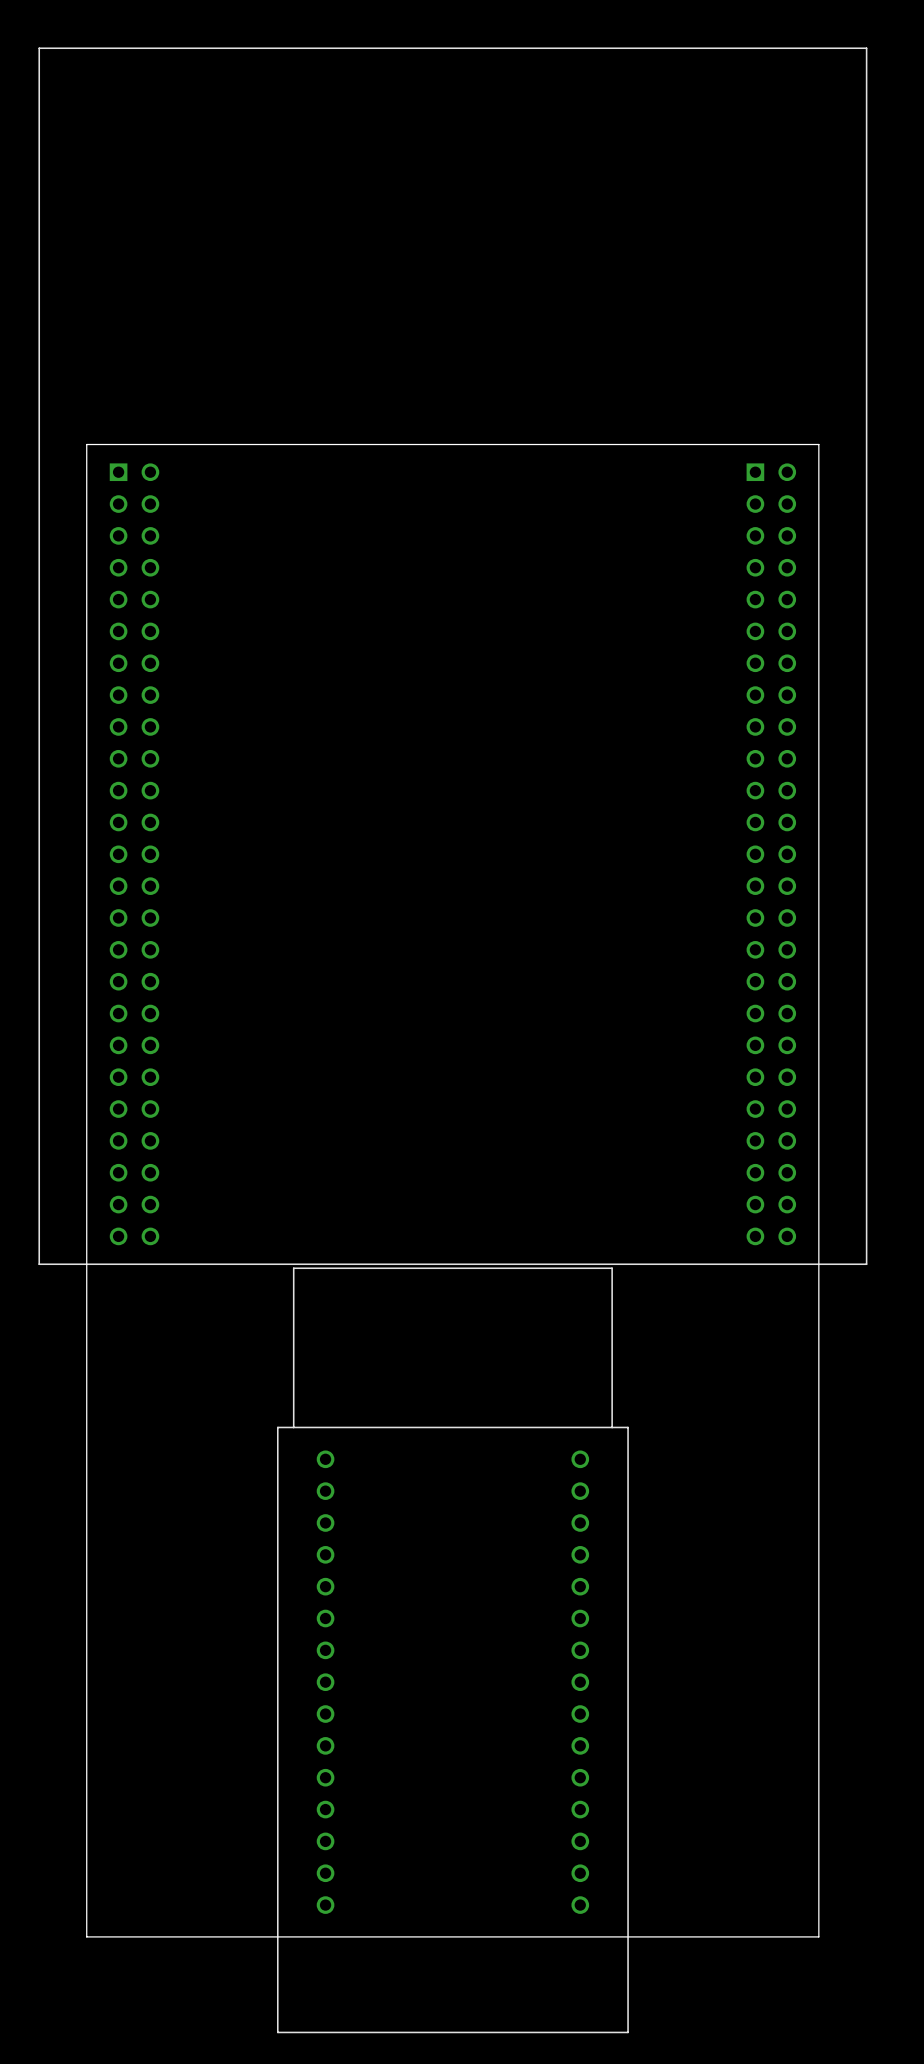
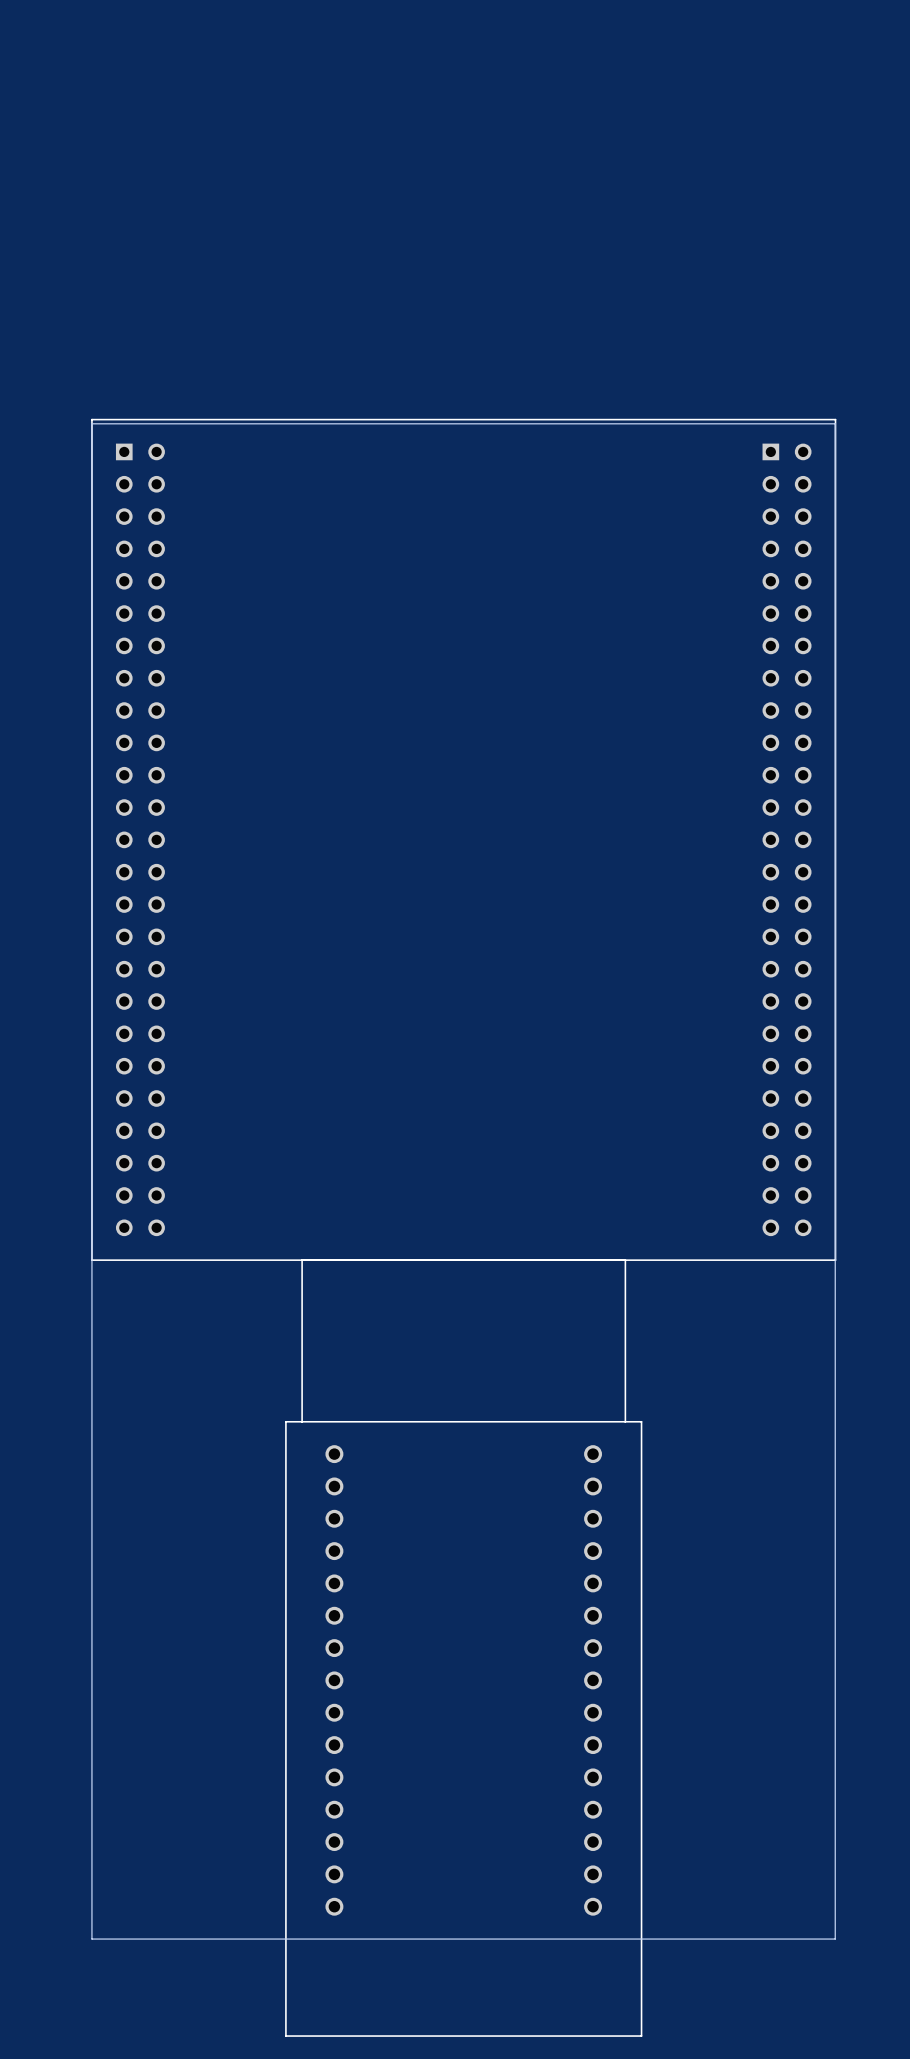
part: (452, 656) -> none
part: none -> (463, 839)

